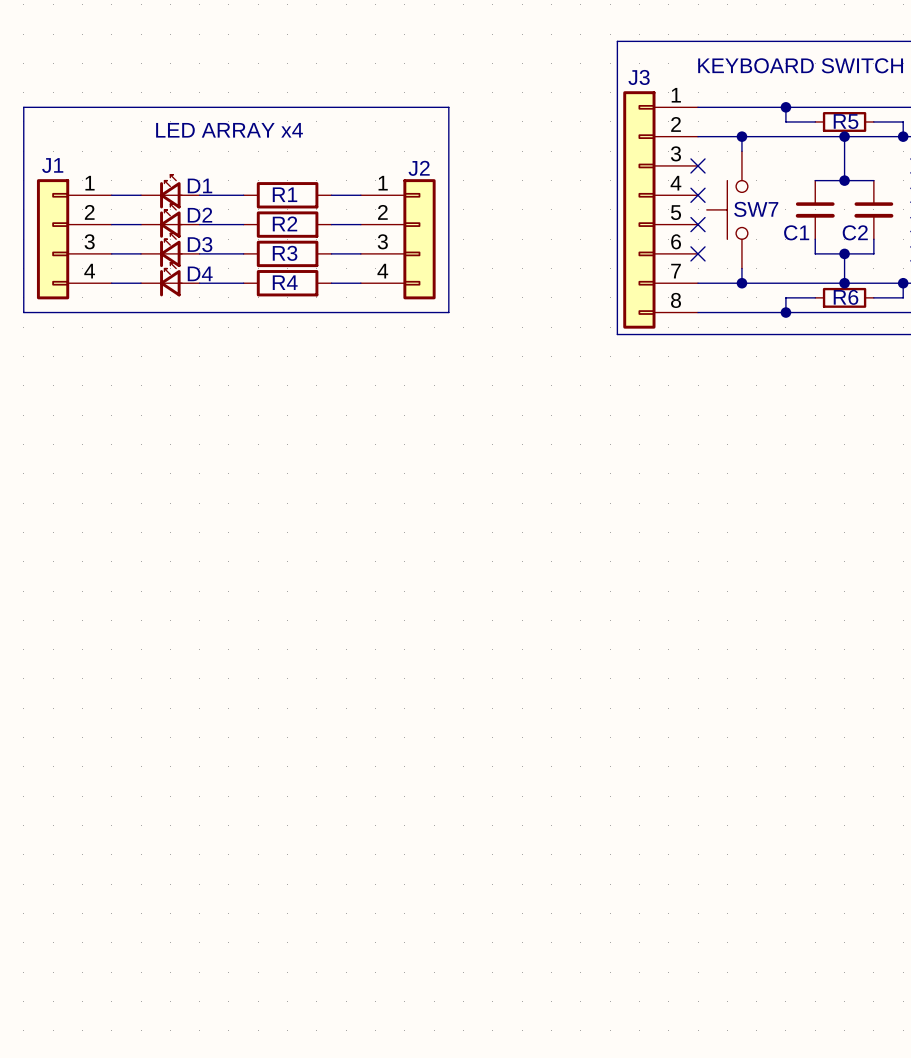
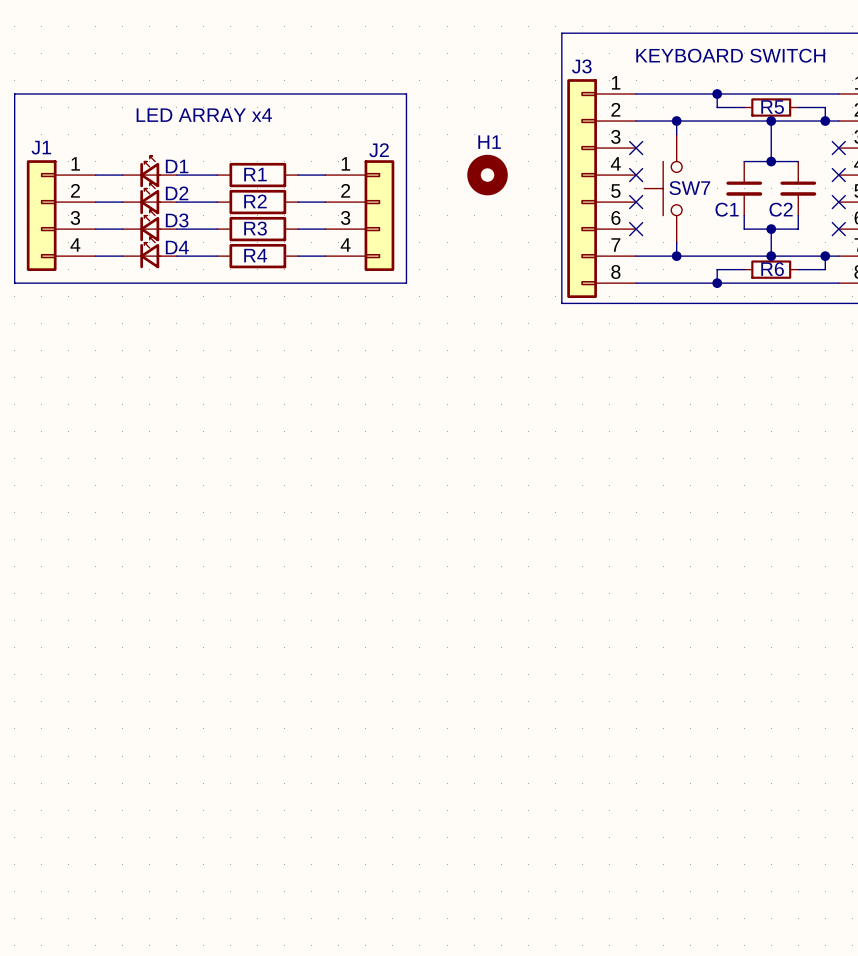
H1: none -> (487, 175)

